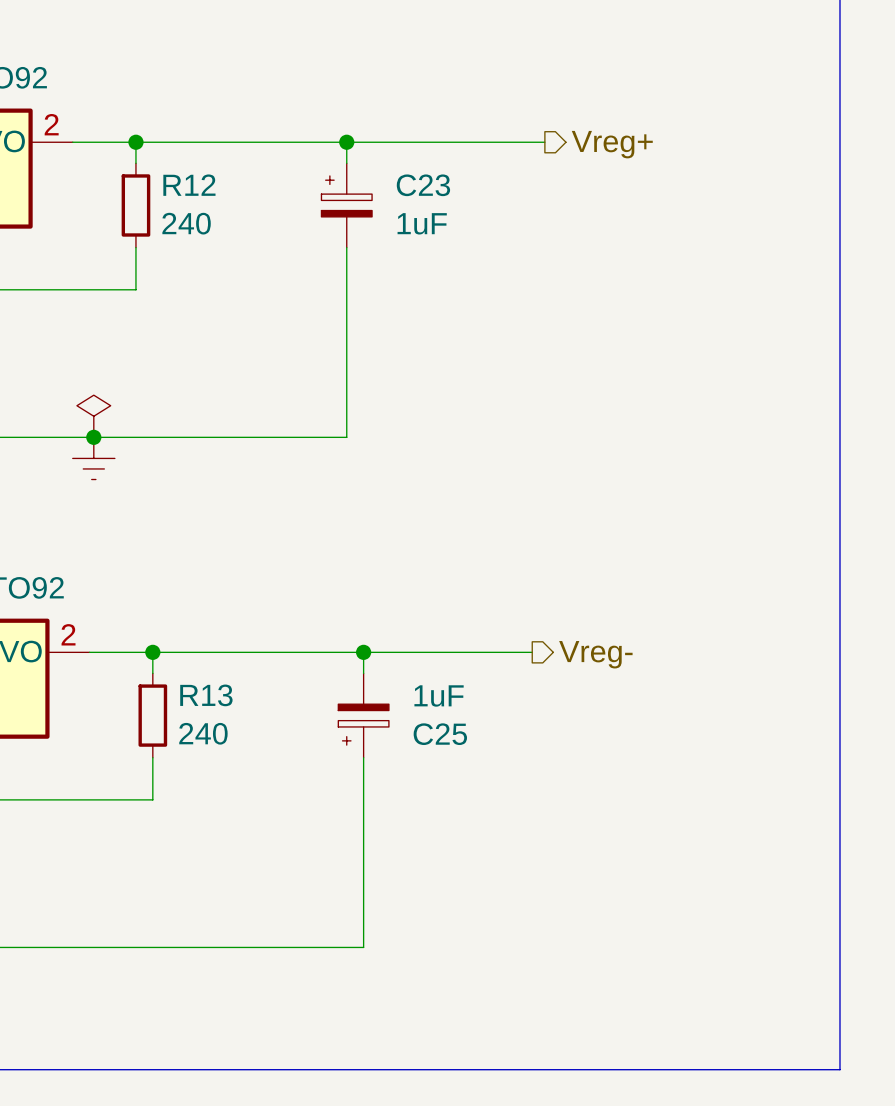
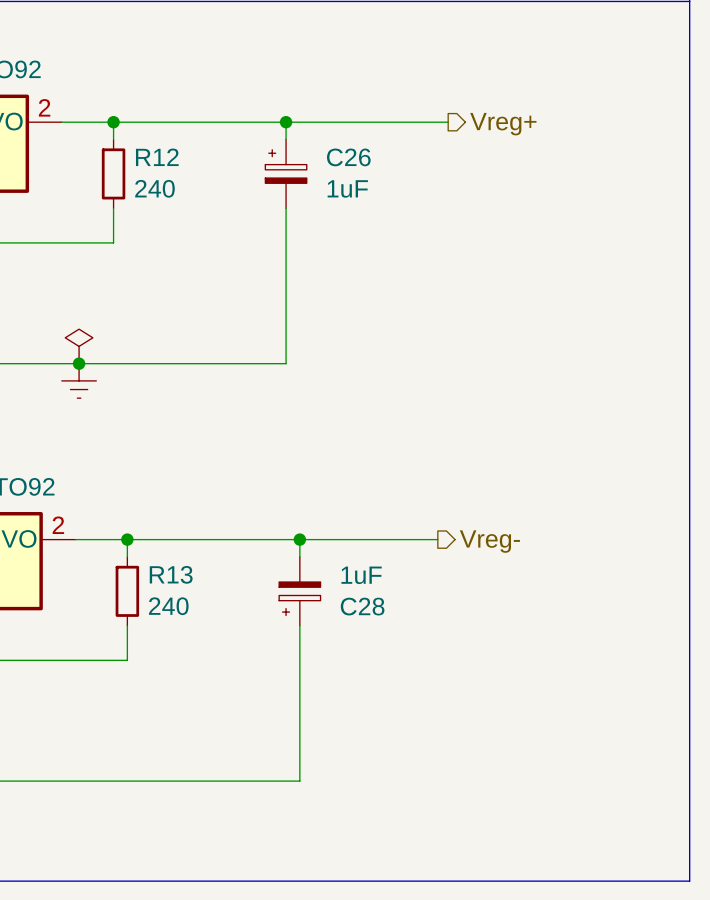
C23 name: C23 (423, 185) -> C26 (348, 157)
C25 name: C25 (440, 734) -> C28 (362, 606)

